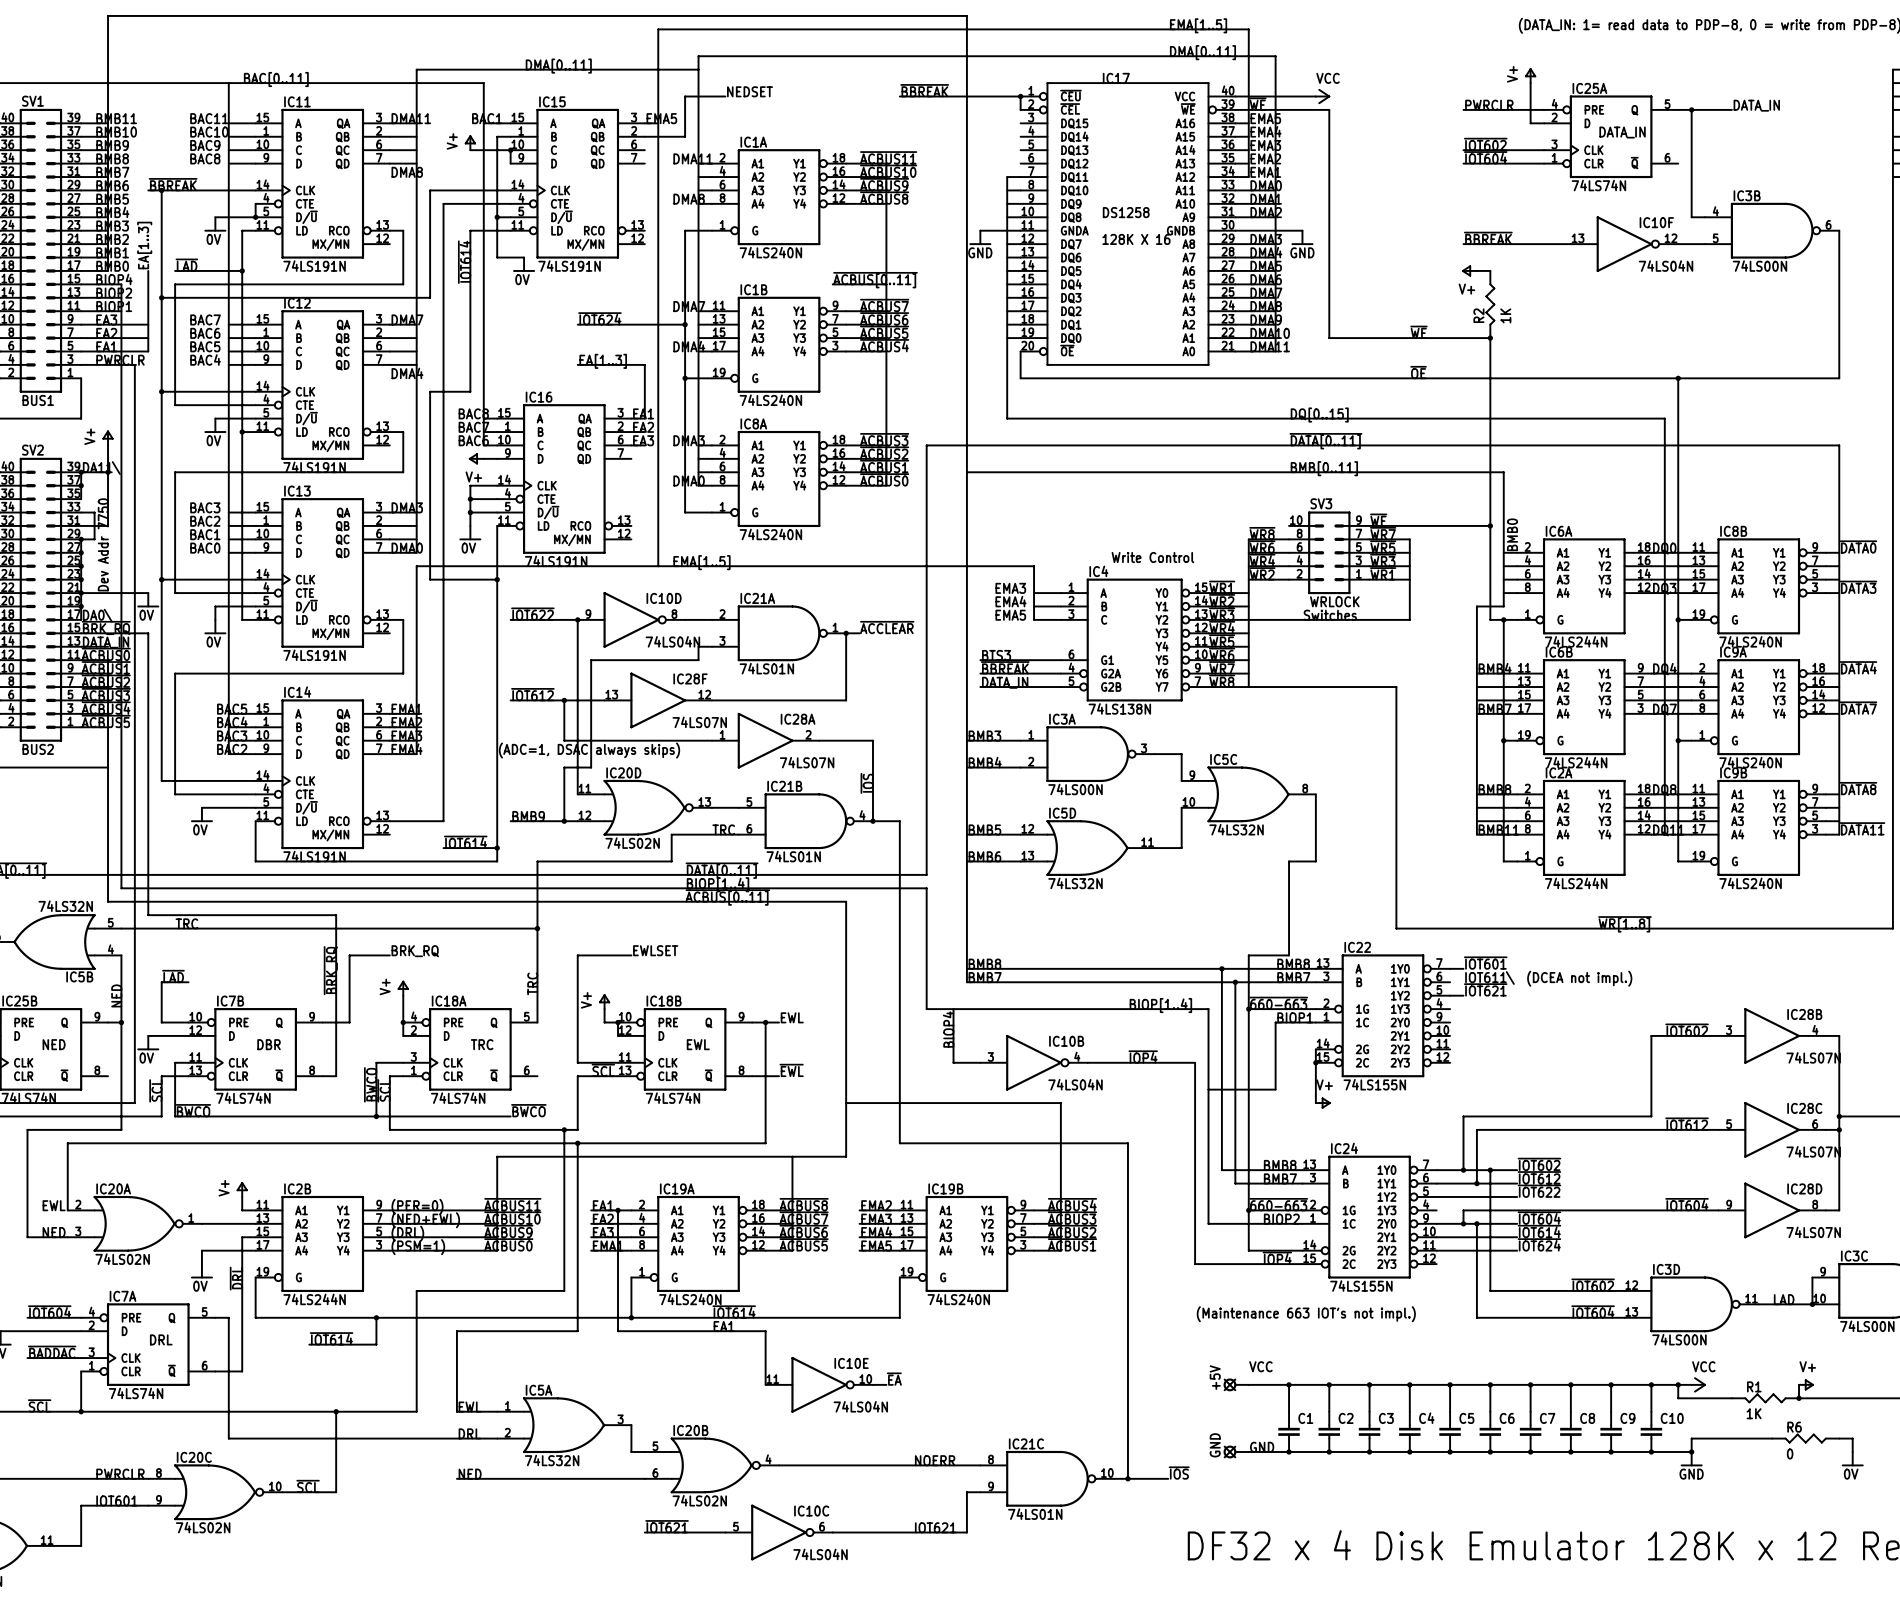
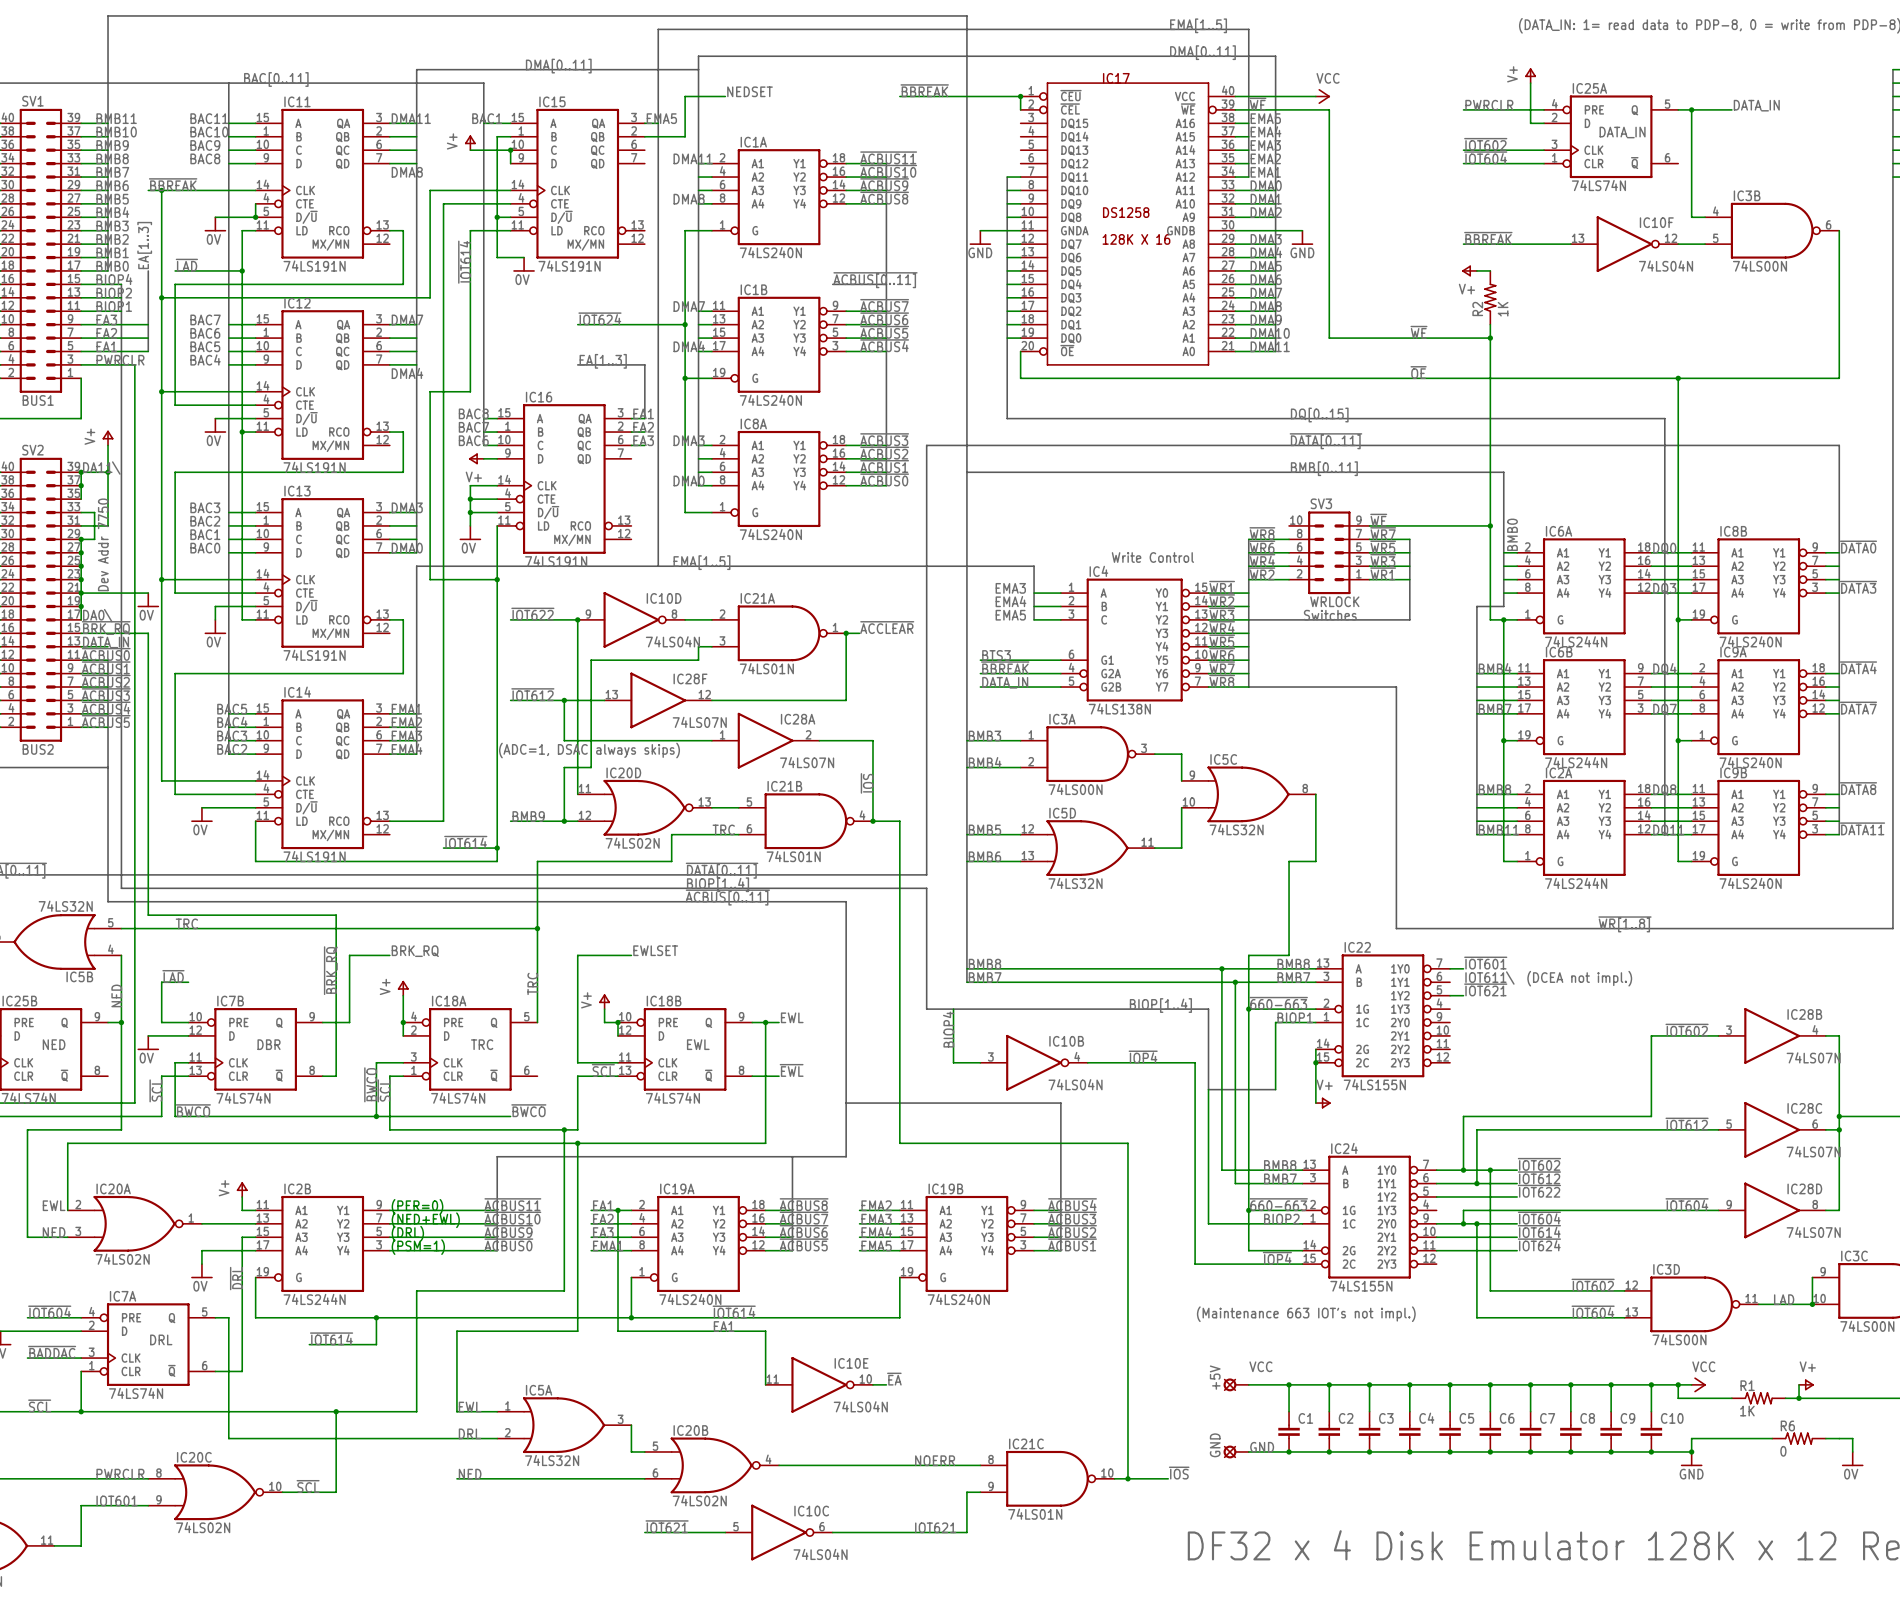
R2 symbol: [1485, 270, 1496, 339] -> [1484, 270, 1497, 325]
R1 symbol: [1731, 1393, 1800, 1404] -> [1731, 1392, 1786, 1405]
R6 symbol: [1772, 1433, 1840, 1444] -> [1772, 1432, 1826, 1445]

